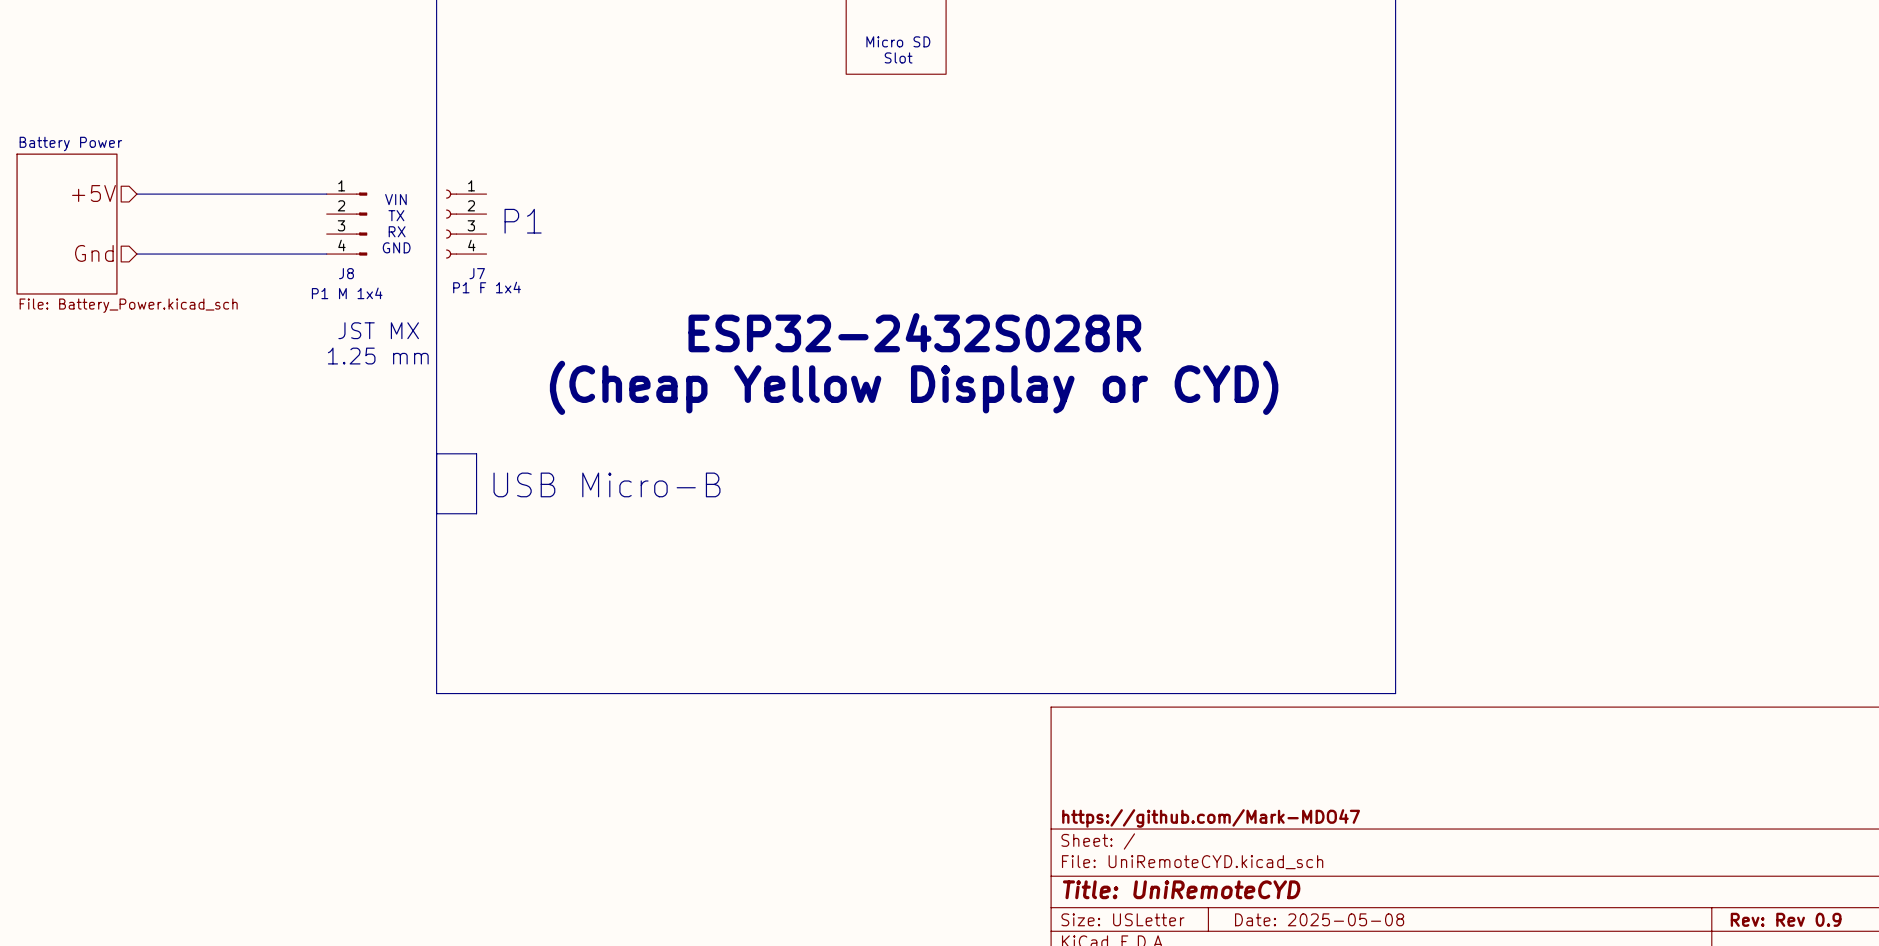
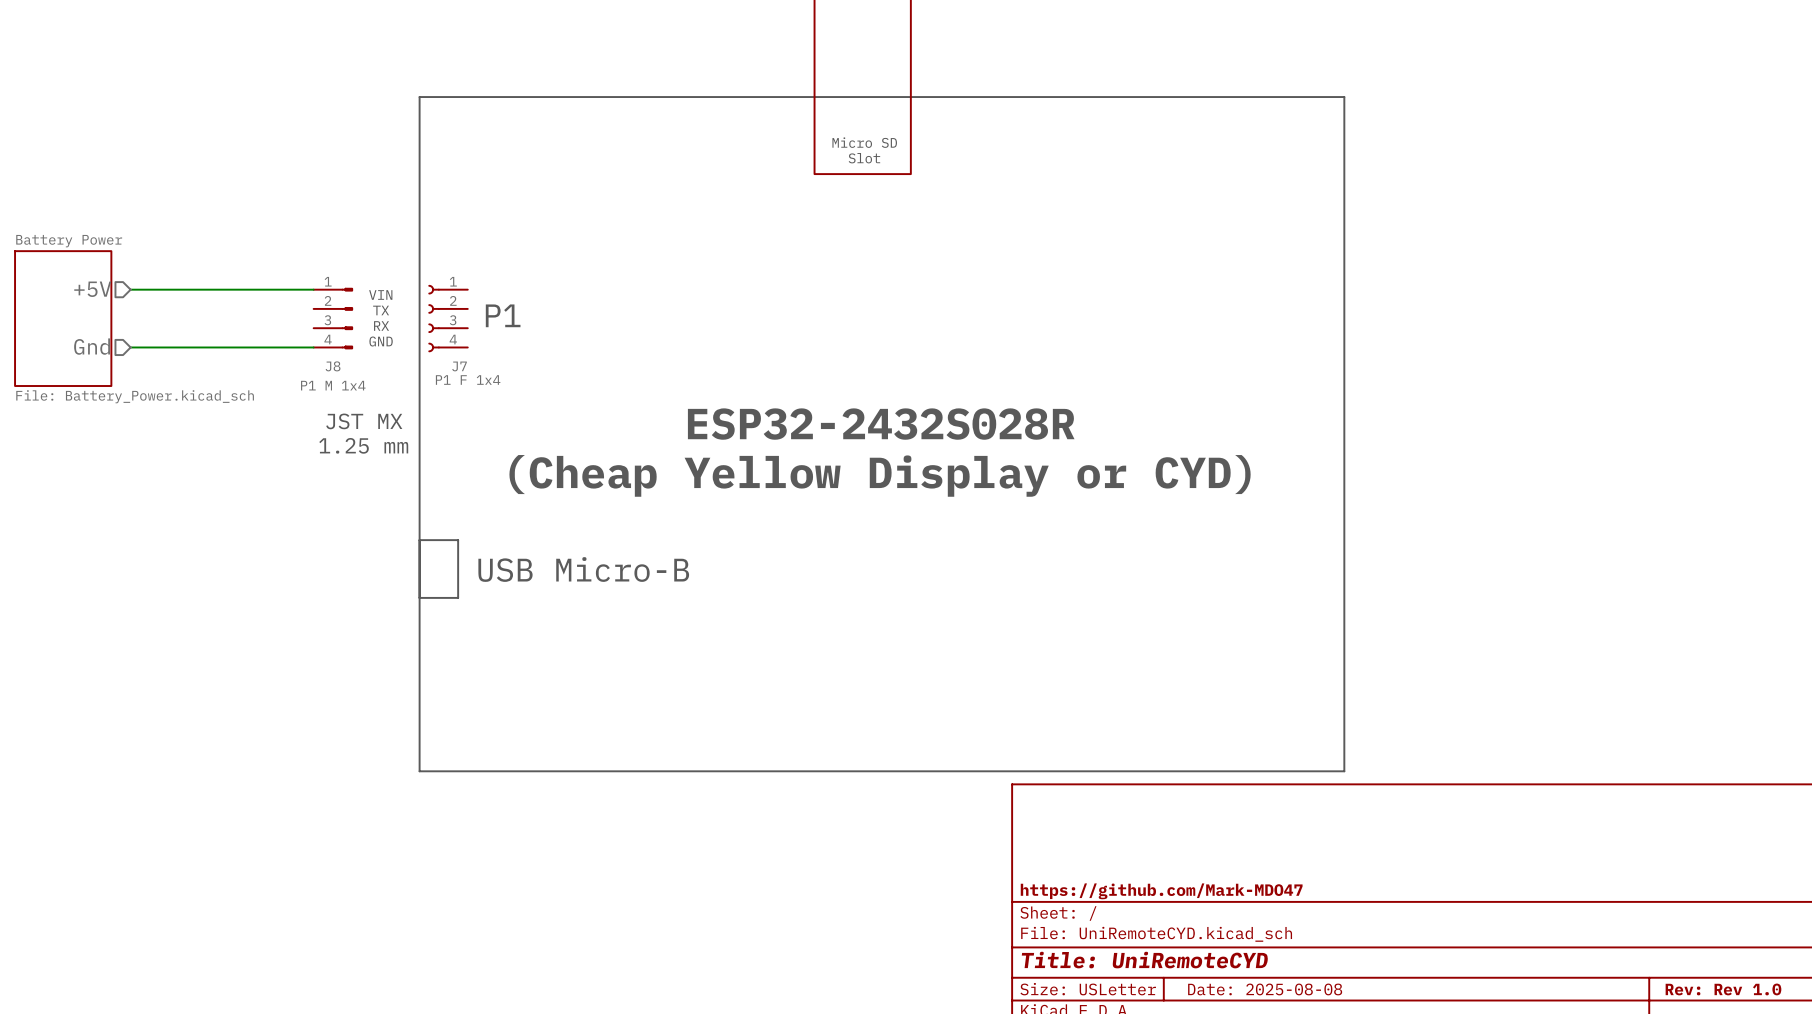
title block: Date: 2025-05-08 (1319, 919) -> Date: 2025-08-08 (1265, 989)
title block: Rev: Rev 0.9 (1786, 919) -> Rev: Rev 1.0 (1723, 989)

